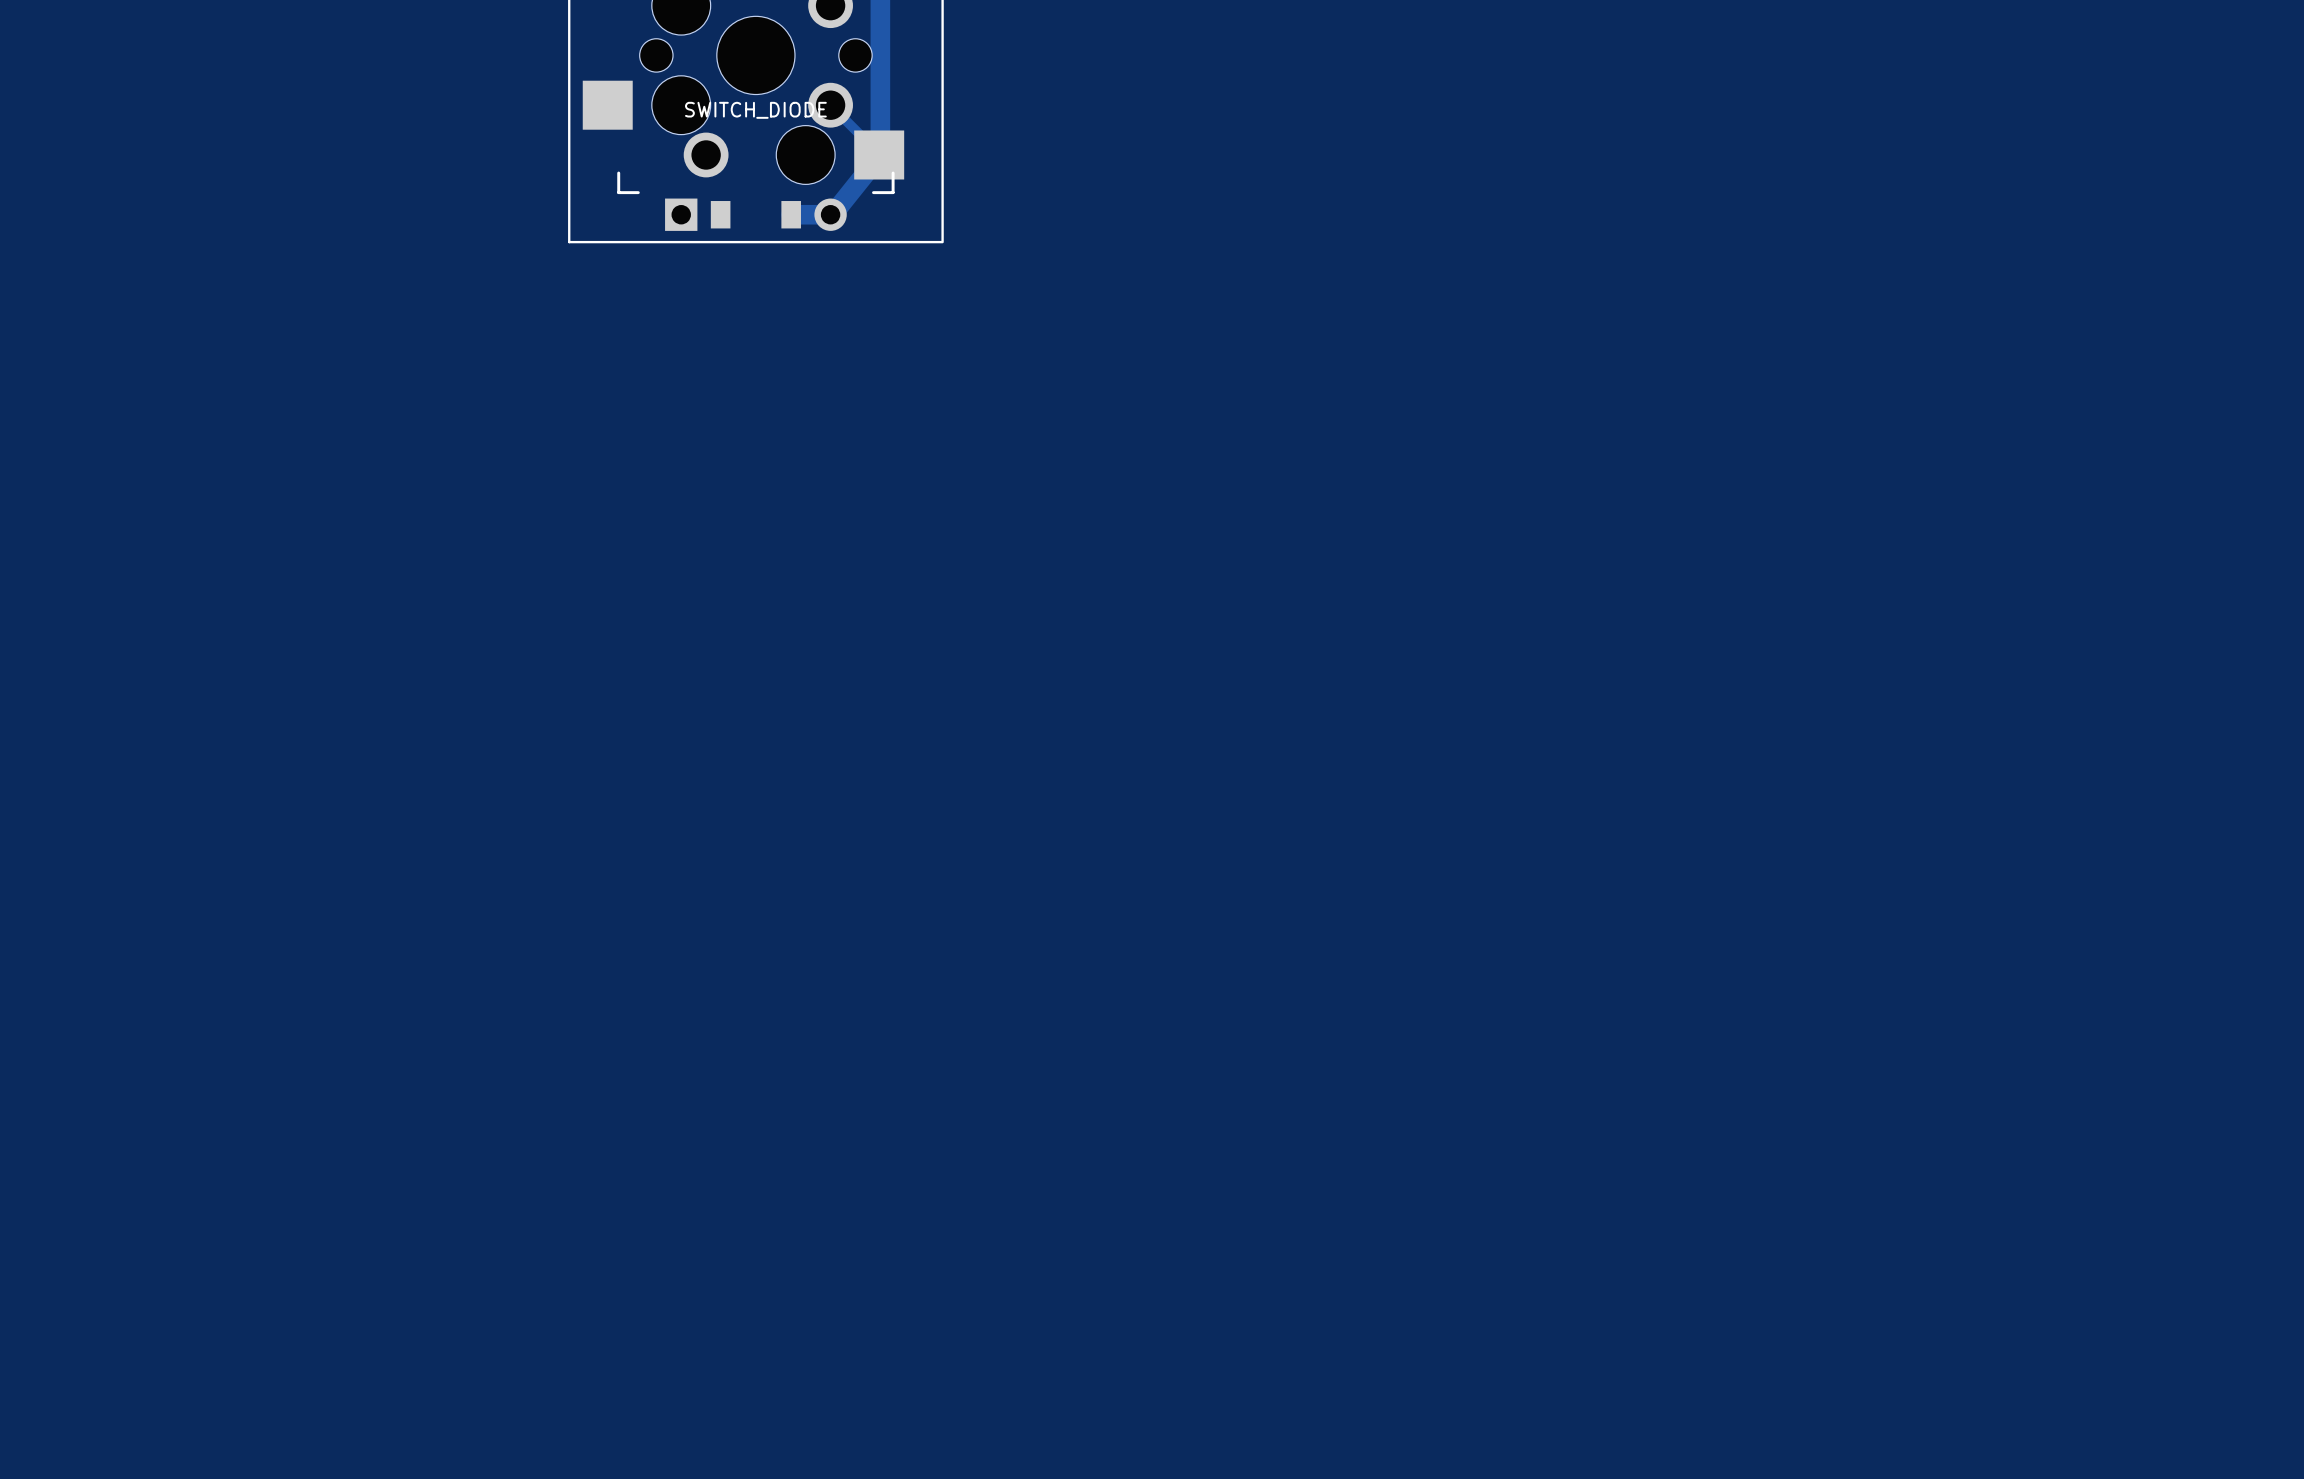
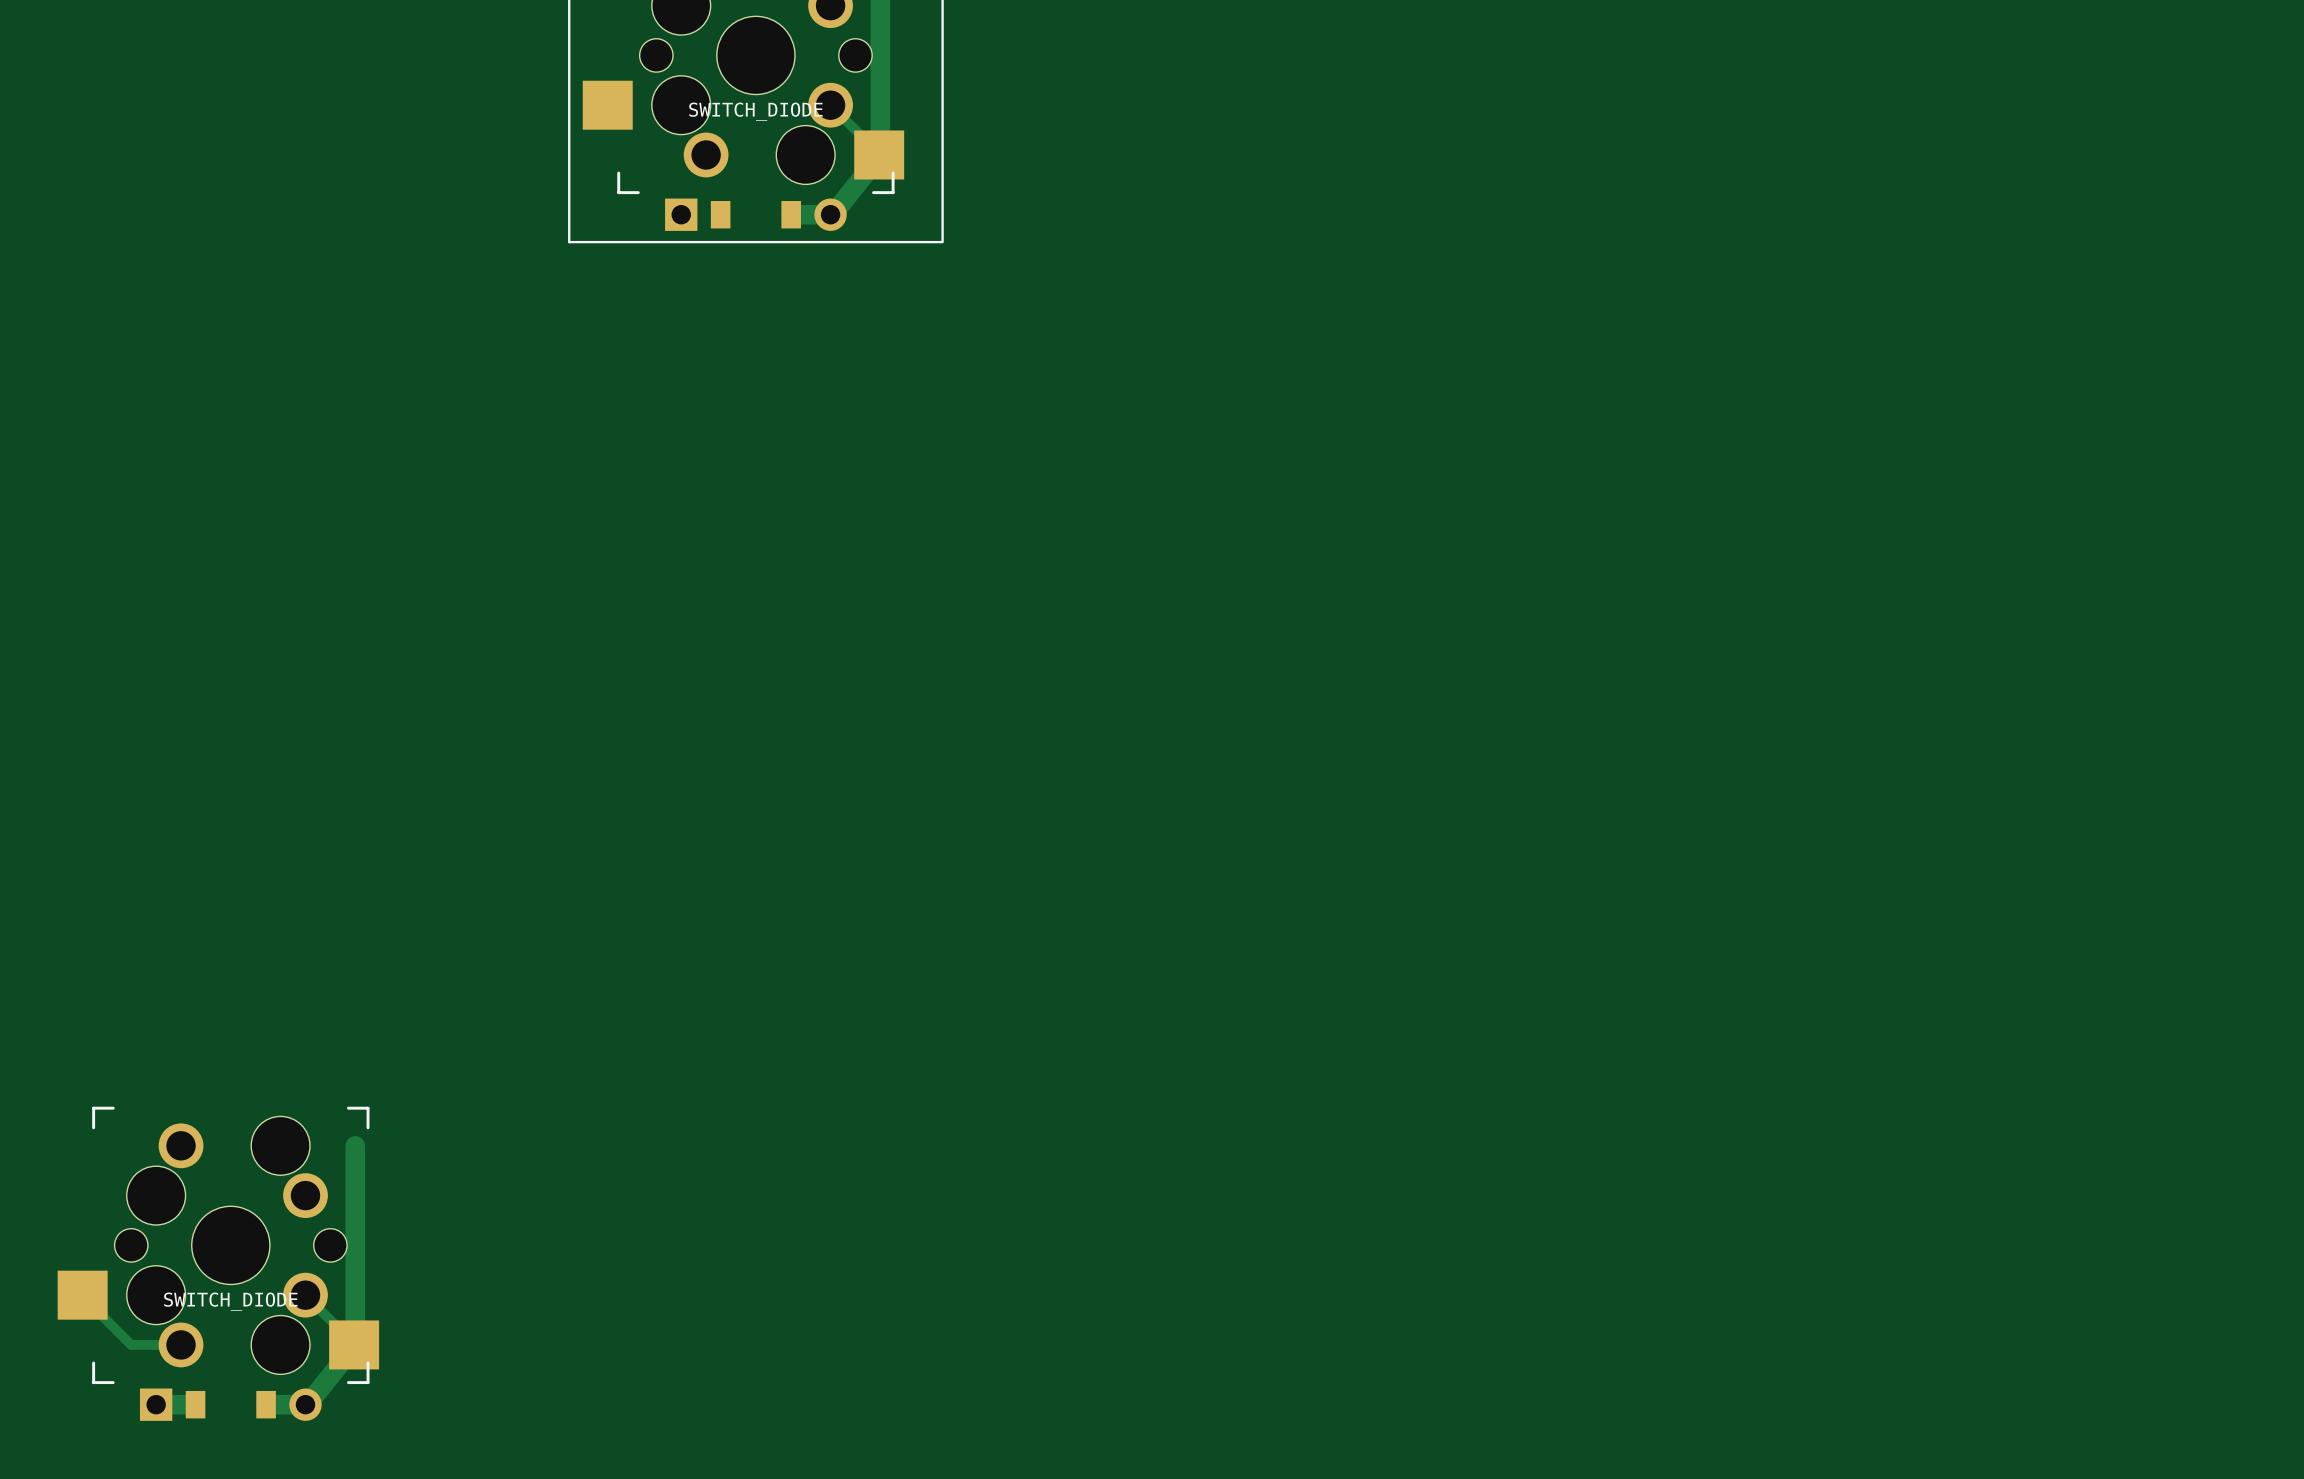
part: none -> SWITCH_DIODE (218, 1263)

